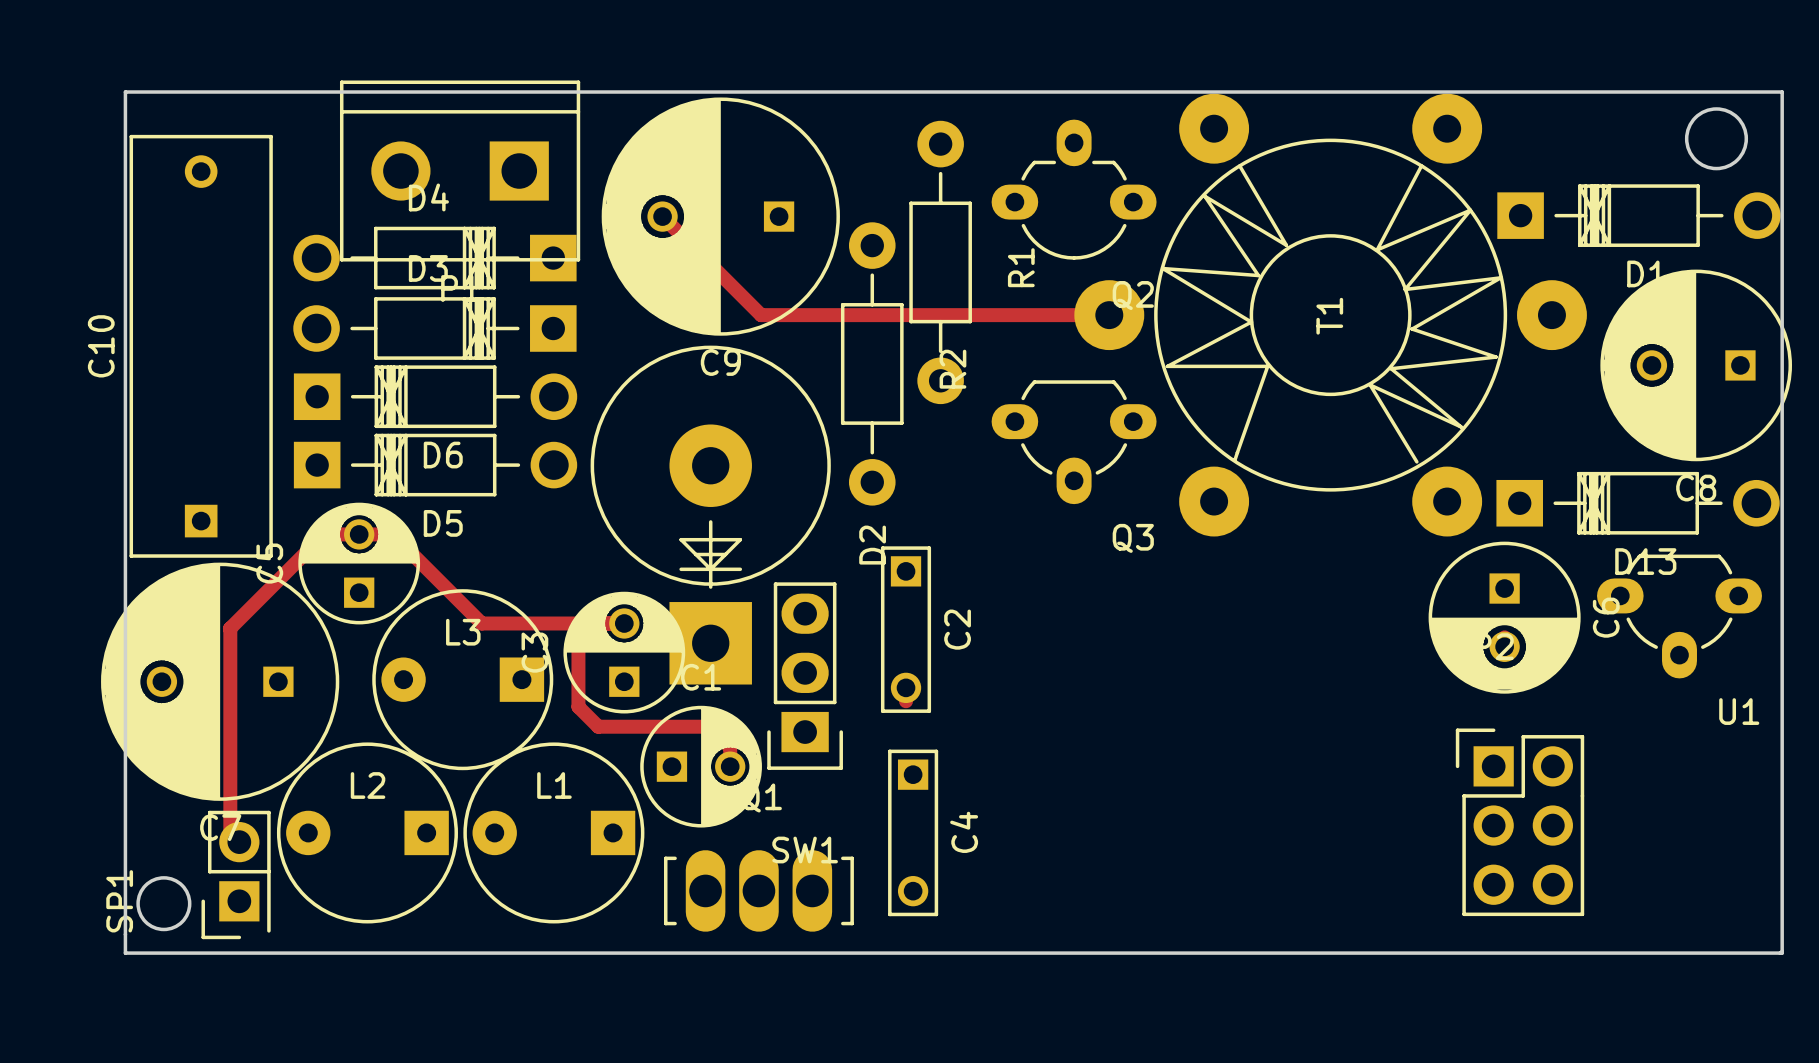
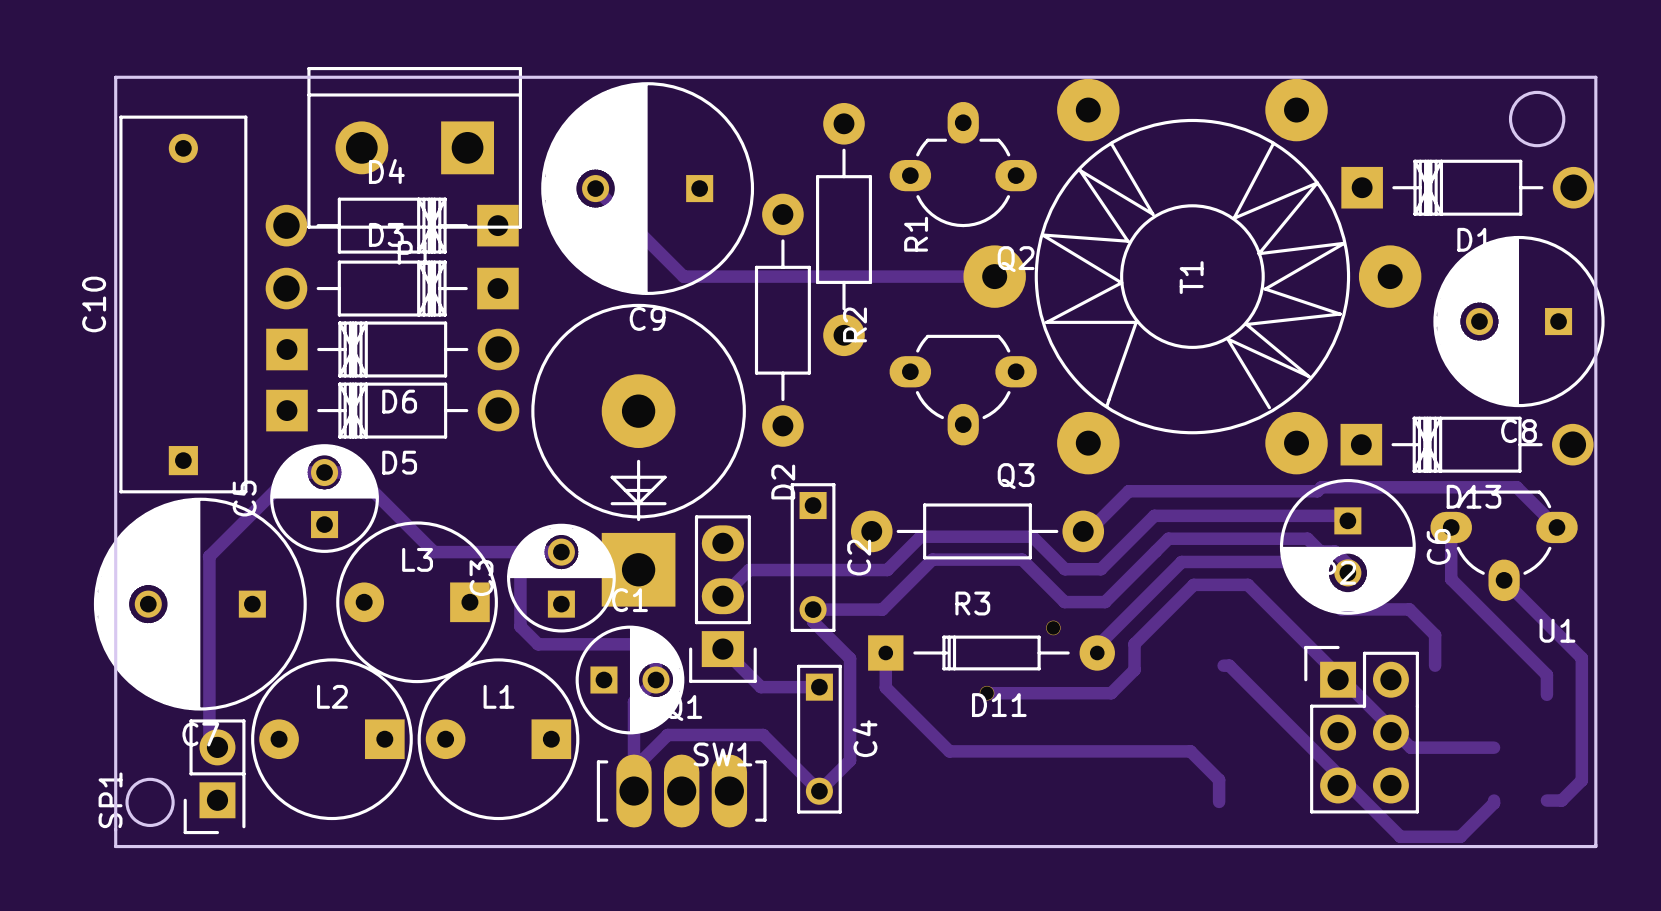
track: none -> (1347, 515) (1154, 515) (1100, 569) (1065, 569) (1032, 536) (920, 536) (887, 570) (749, 570) (722, 596)
track: none -> (1451, 527) (1451, 579) (1546, 674) (1546, 694)
track: none -> (1556, 527) (1516, 487) (1321, 487) (1317, 491) (1128, 491) (1088, 531) (1083, 531)
R3: none -> (977, 531)
track: none -> (1347, 564) (1334, 551) (1320, 551) (1307, 538) (1168, 538) (1105, 602) (1064, 602) (1022, 559) (932, 559) (882, 609) (813, 609)
track: none -> (1504, 580) (1581, 658) (1581, 780) (1561, 800) (1546, 800)
track: none -> (813, 621) (850, 658) (850, 760) (819, 791) (763, 734) (667, 734) (633, 768) (633, 702) (656, 680)
via: none -> (1053, 627)
track: none -> (722, 649) (760, 687) (819, 687)
track: none -> (885, 652) (885, 687) (949, 751) (1190, 751) (1219, 779) (1219, 801)
D11: none -> (991, 652)
track: none -> (1097, 652) (1090, 652) (1181, 561) (1293, 561) (1341, 609) (1409, 609) (1435, 635) (1435, 665)
track: none -> (1223, 665) (1229, 665) (1400, 836) (1460, 836) (1494, 803) (1494, 800)
track: none -> (987, 693) (1111, 693) (1134, 669) (1134, 644) (1193, 584) (1247, 584) (1410, 747) (1494, 747)
via: none -> (987, 693)

